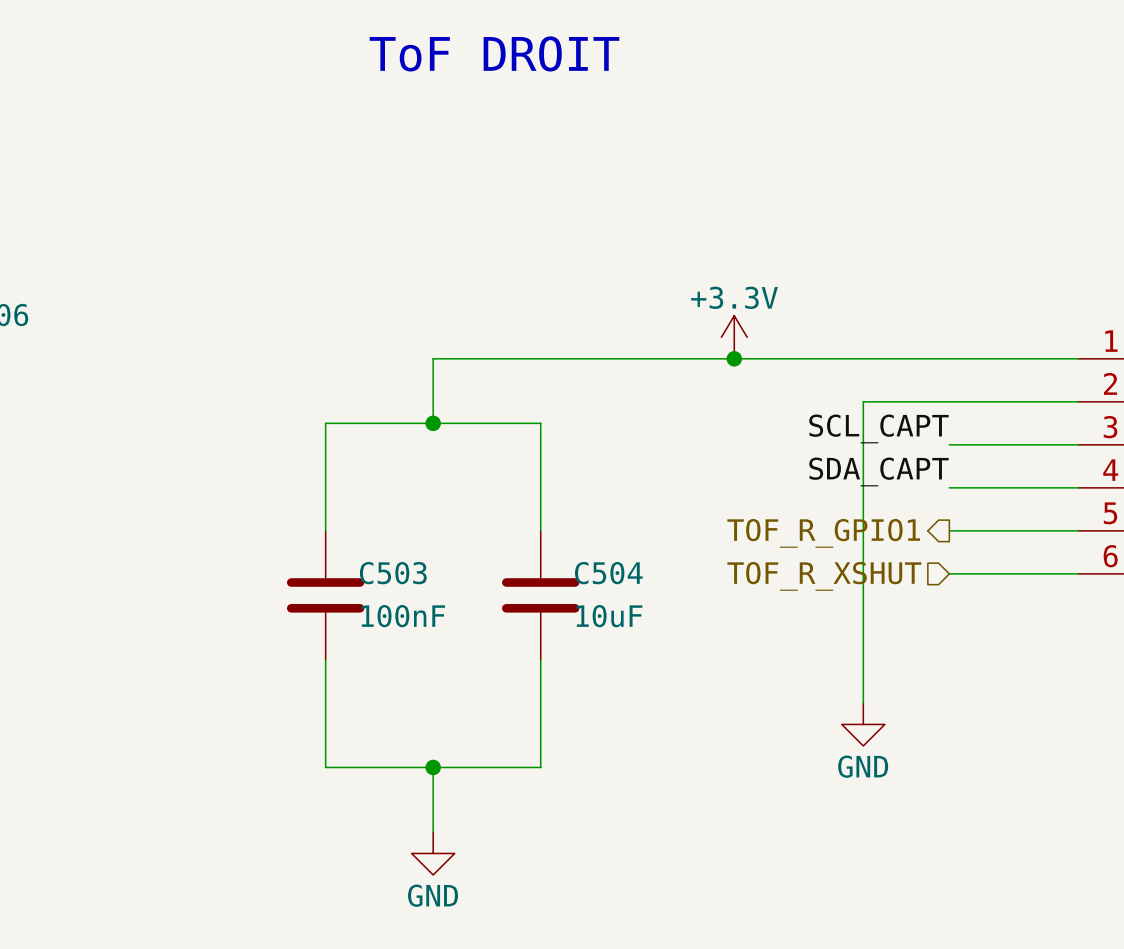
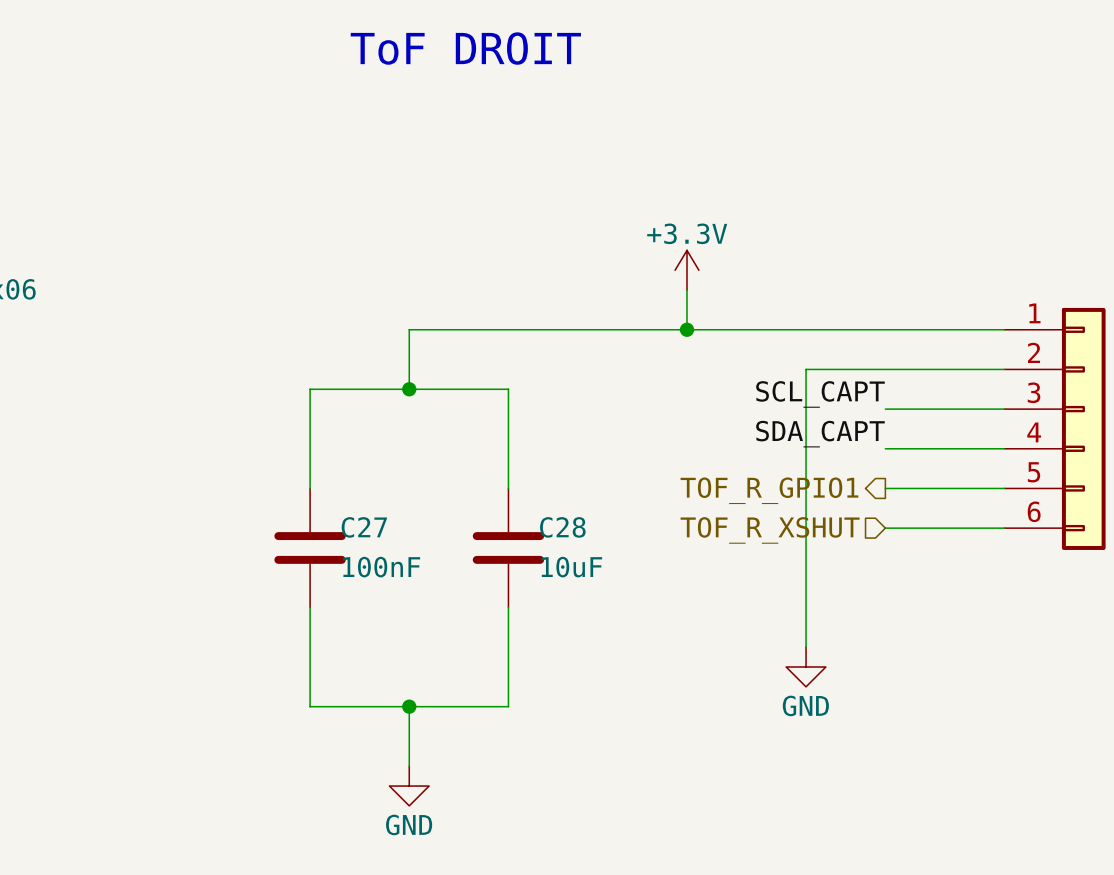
power symbol position: +3.3V (734, 337) -> +3.3V (687, 270)
C503 name: C503 (393, 573) -> C27 (364, 527)
C504 name: C504 (608, 573) -> C28 (562, 527)

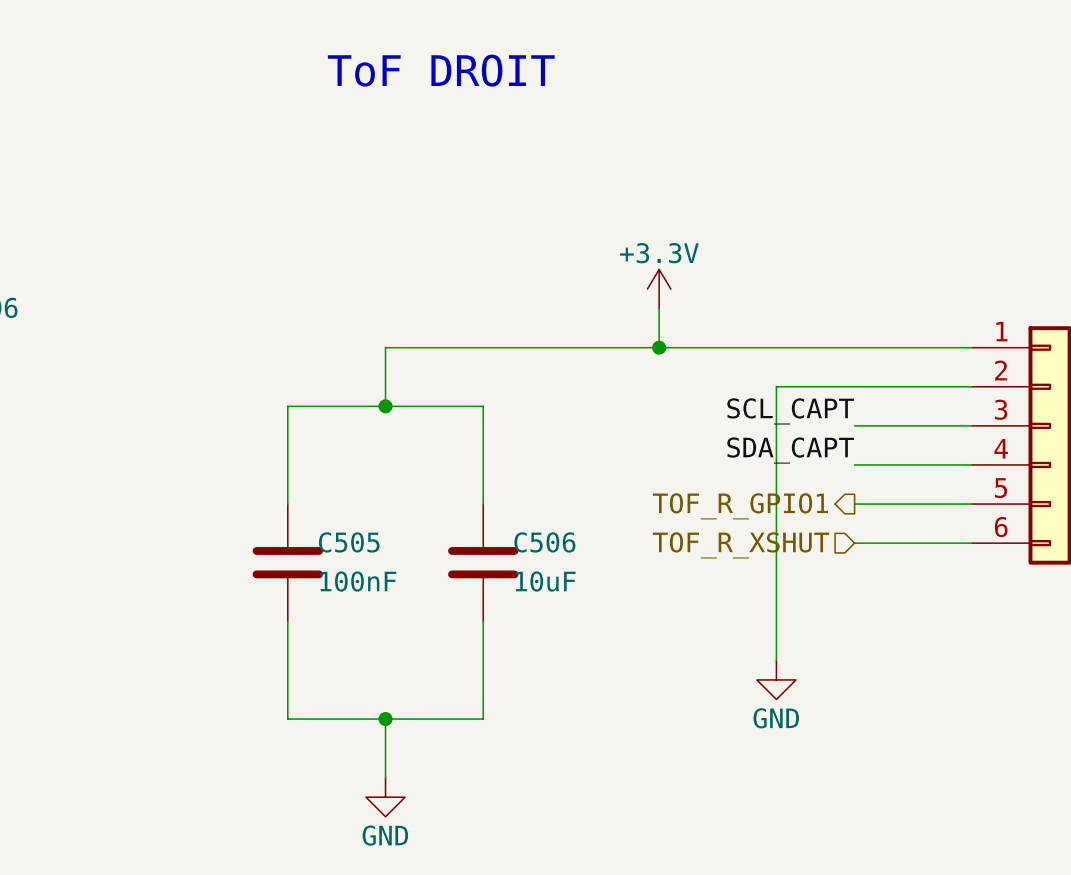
C27 name: C27 (364, 527) -> C505 (349, 542)
C28 name: C28 (562, 527) -> C506 (544, 542)

